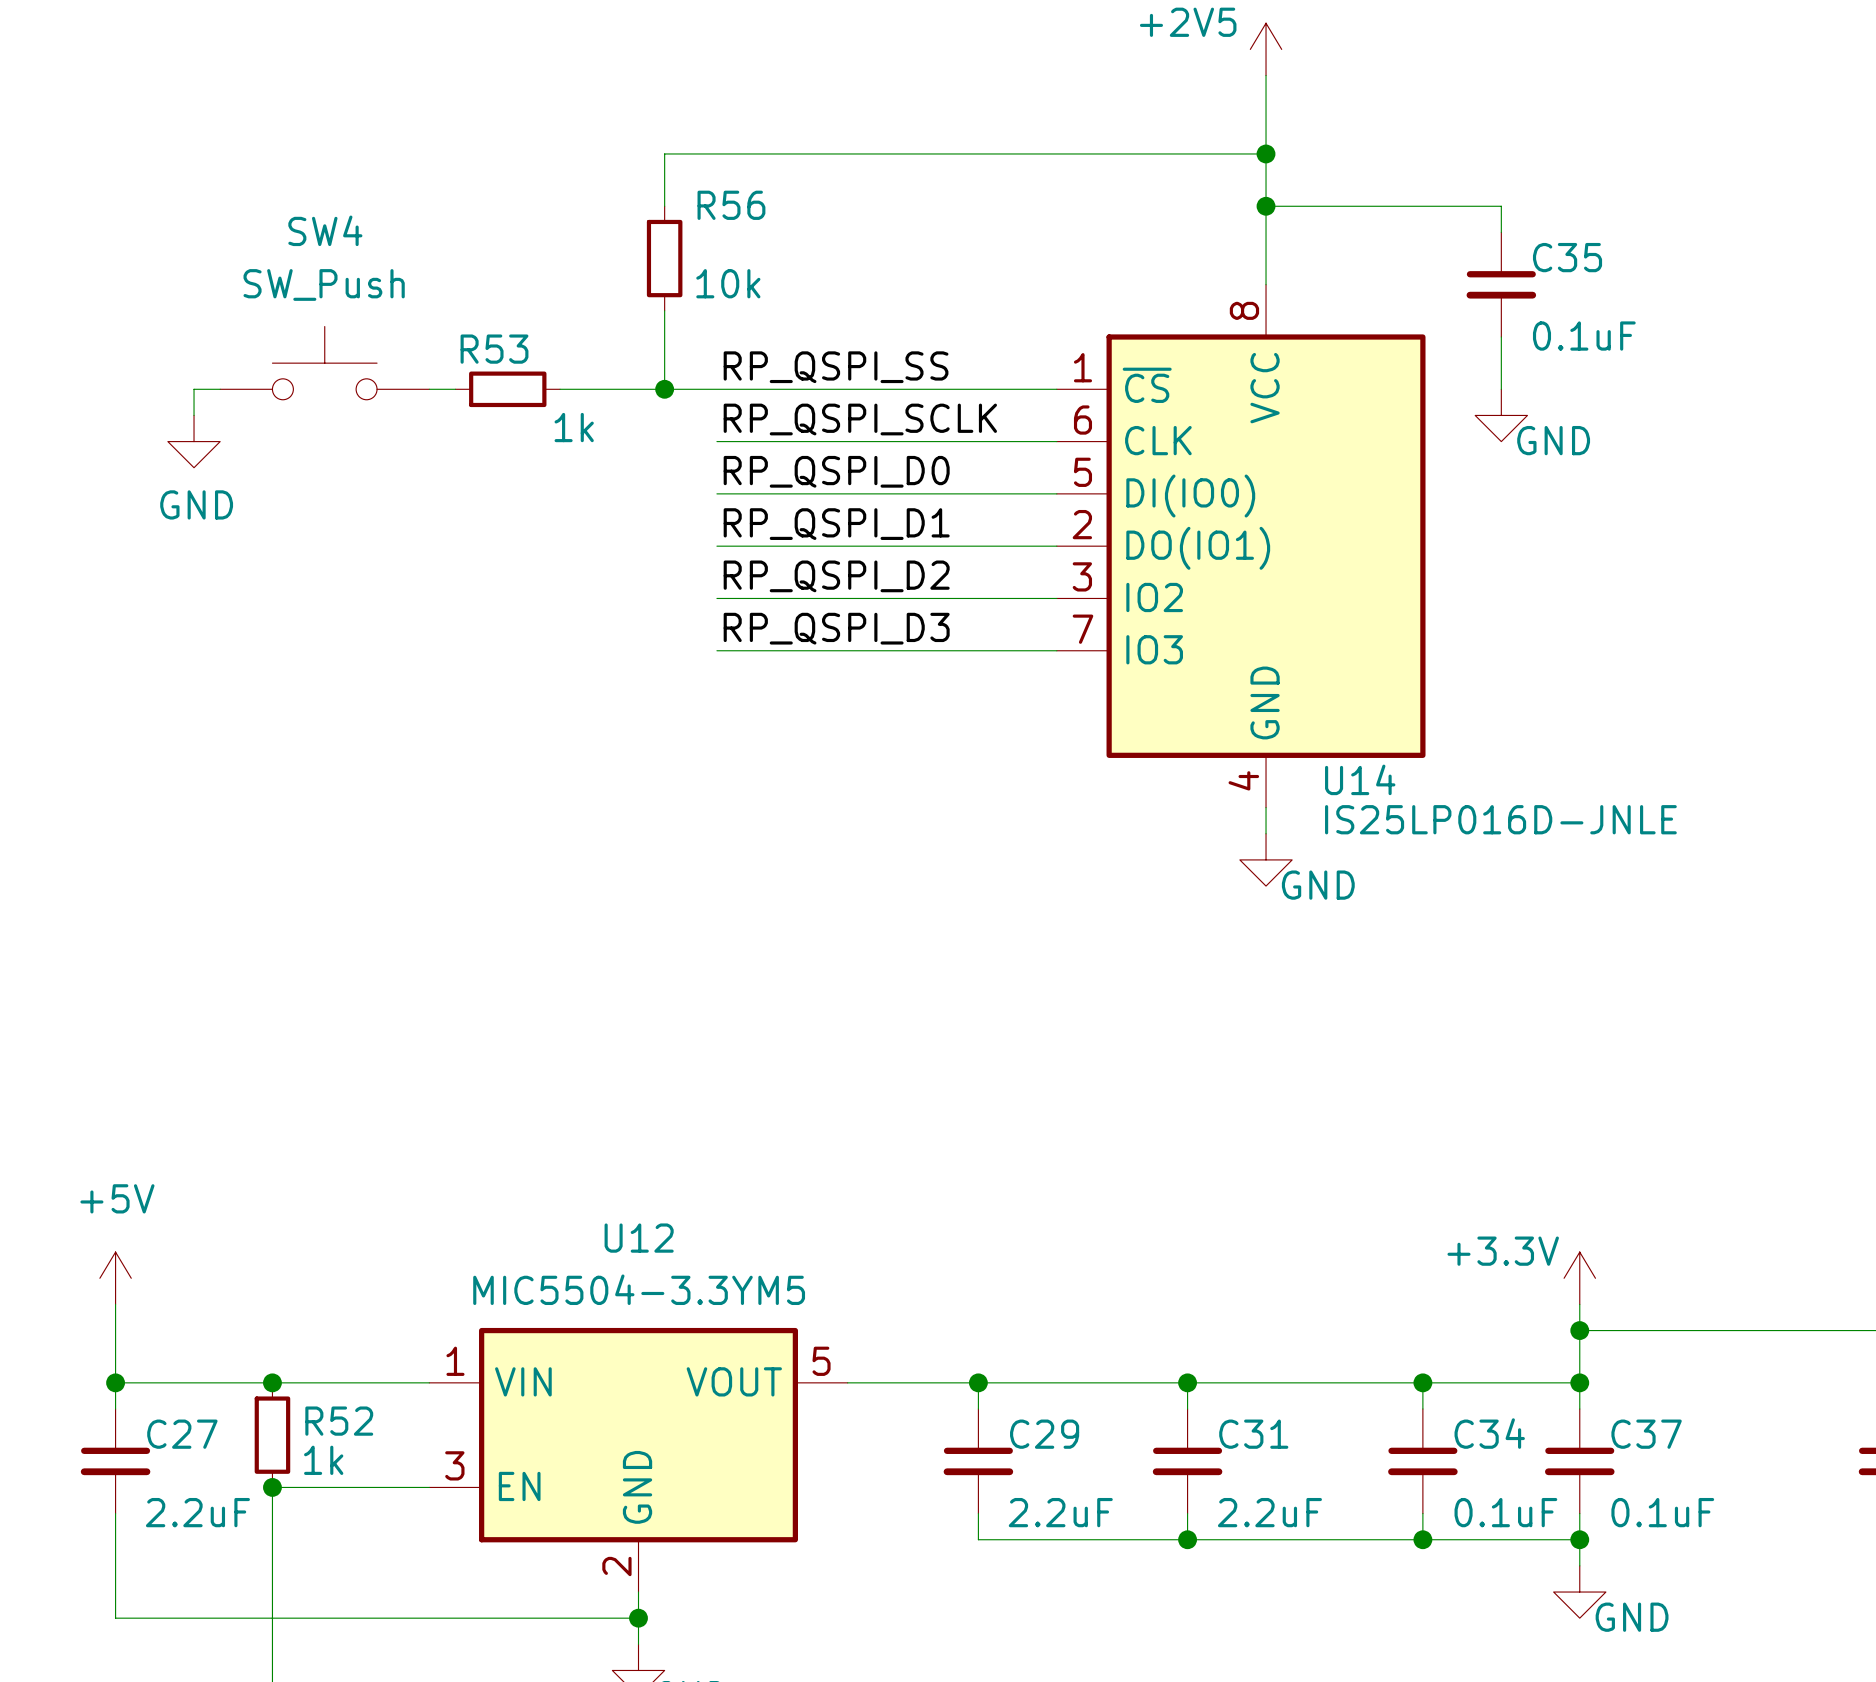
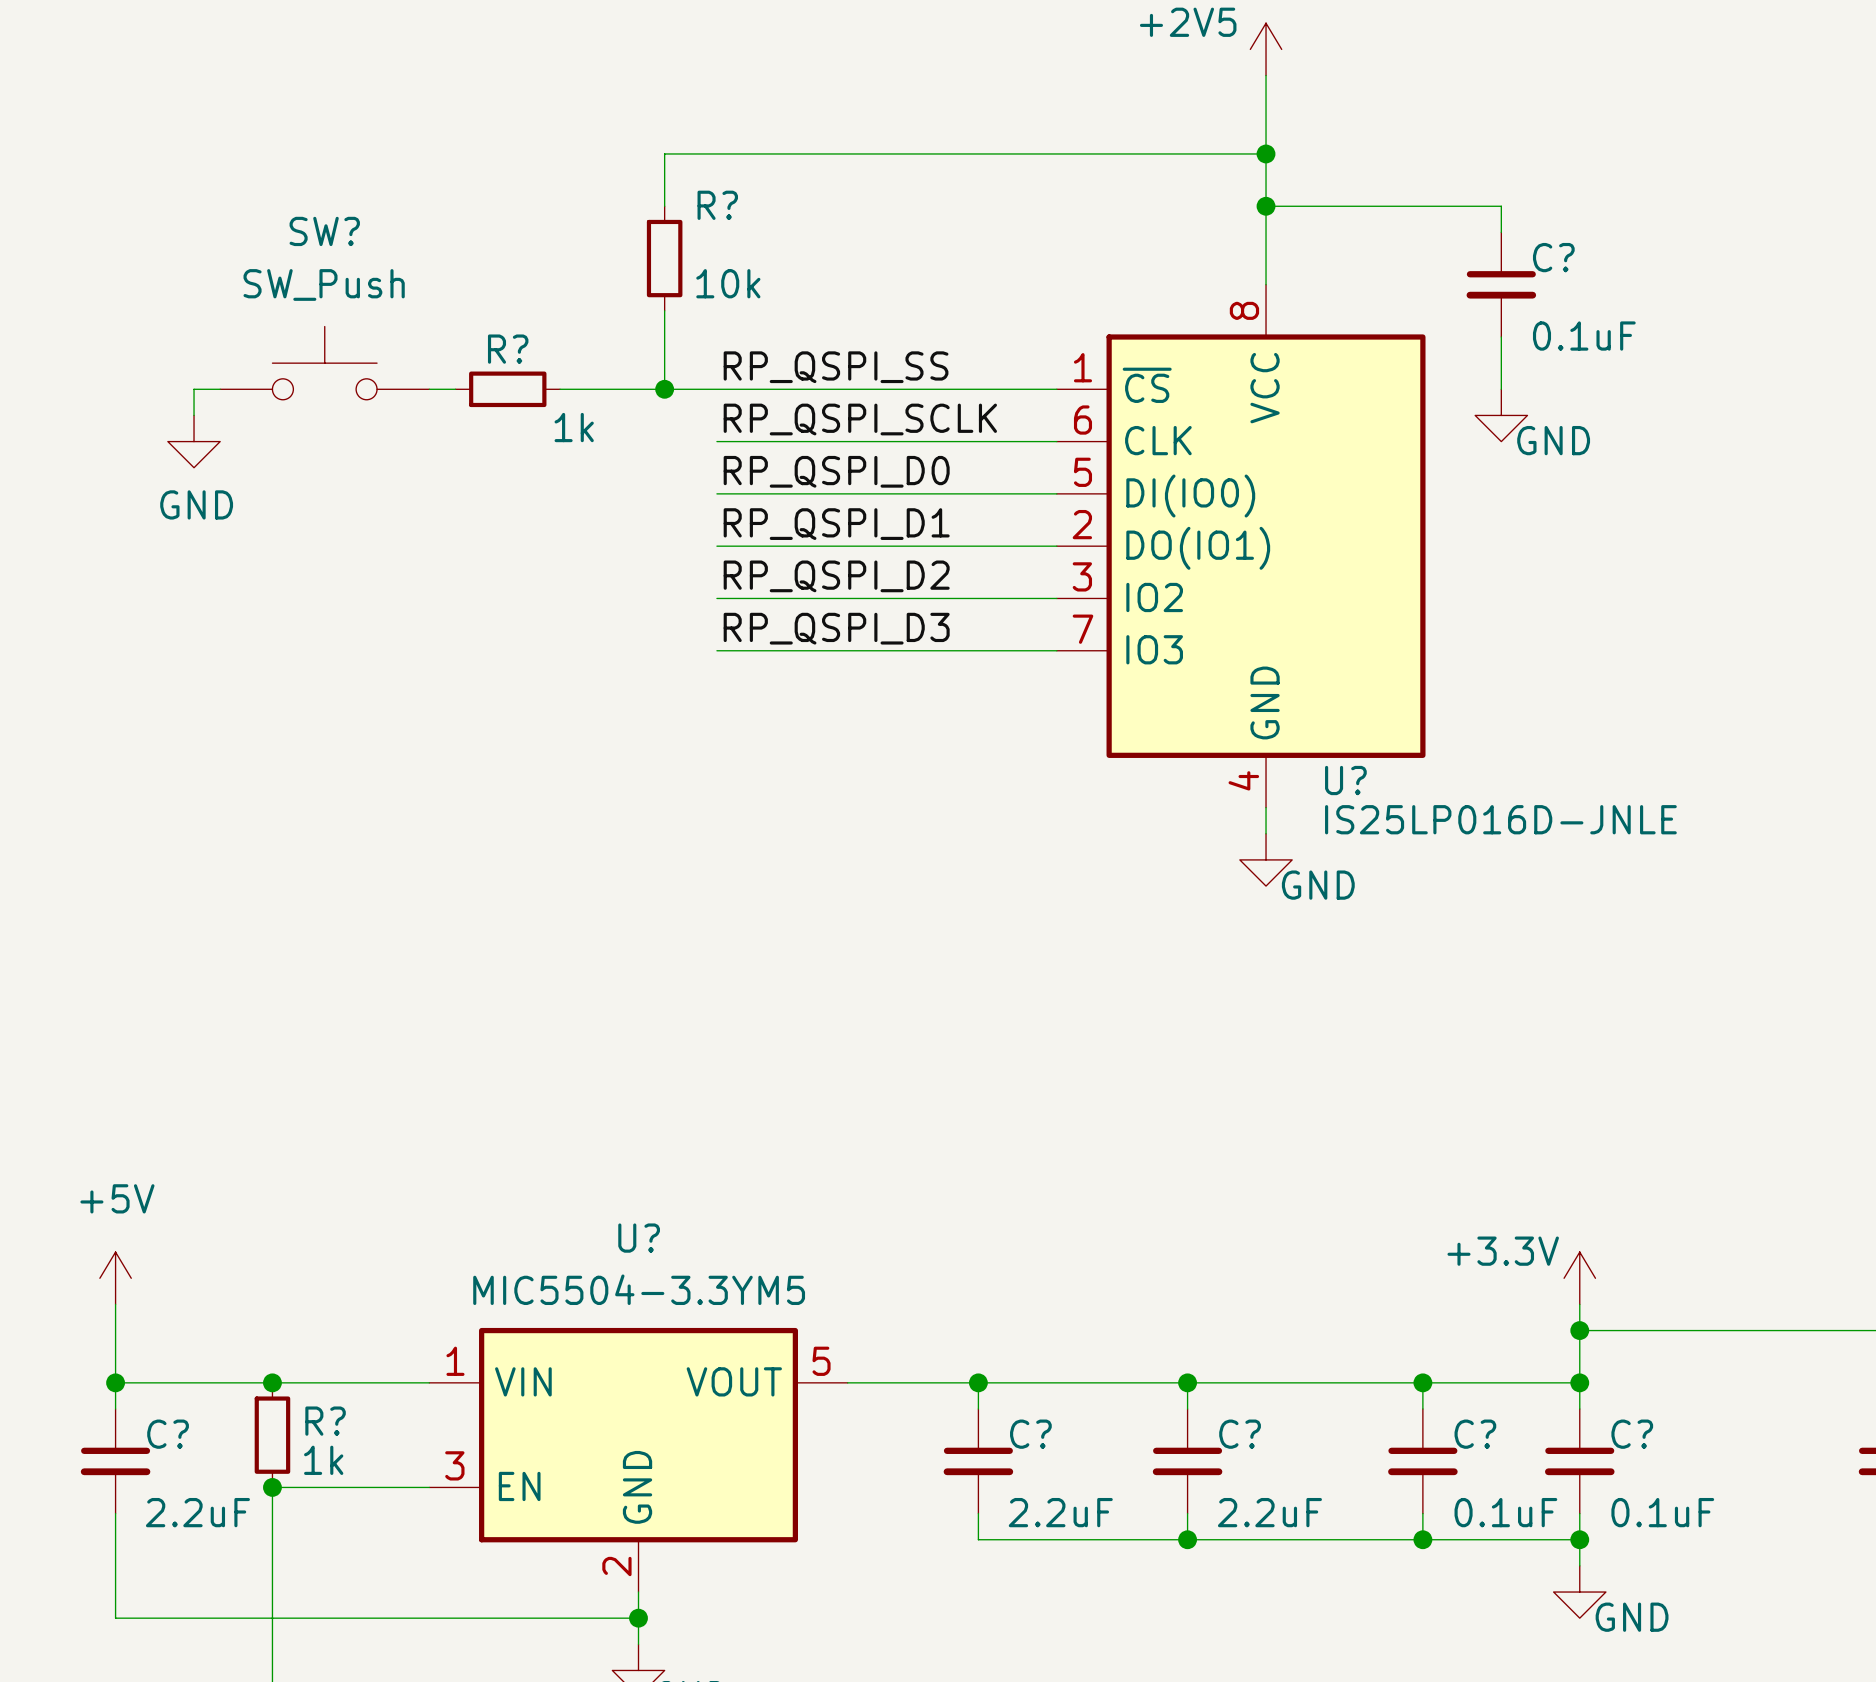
R56 name: R56 (731, 205) -> R? (717, 205)
SW4 name: SW4 (325, 230) -> SW? (324, 231)
C35 name: C35 (1567, 257) -> C? (1553, 257)
R53 name: R53 (494, 349) -> R? (508, 349)
U14 name: U14 (1360, 779) -> U? (1345, 780)
U12 name: U12 (639, 1238) -> U? (639, 1238)
R52 name: R52 (339, 1421) -> R? (325, 1421)
C34 name: C34 (1489, 1433) -> C? (1475, 1434)
C27 name: C27 (182, 1434) -> C? (168, 1434)
C29 name: C29 (1044, 1434) -> C? (1030, 1434)
C31 name: C31 (1253, 1434) -> C? (1240, 1434)
C37 name: C37 (1646, 1434) -> C? (1632, 1434)

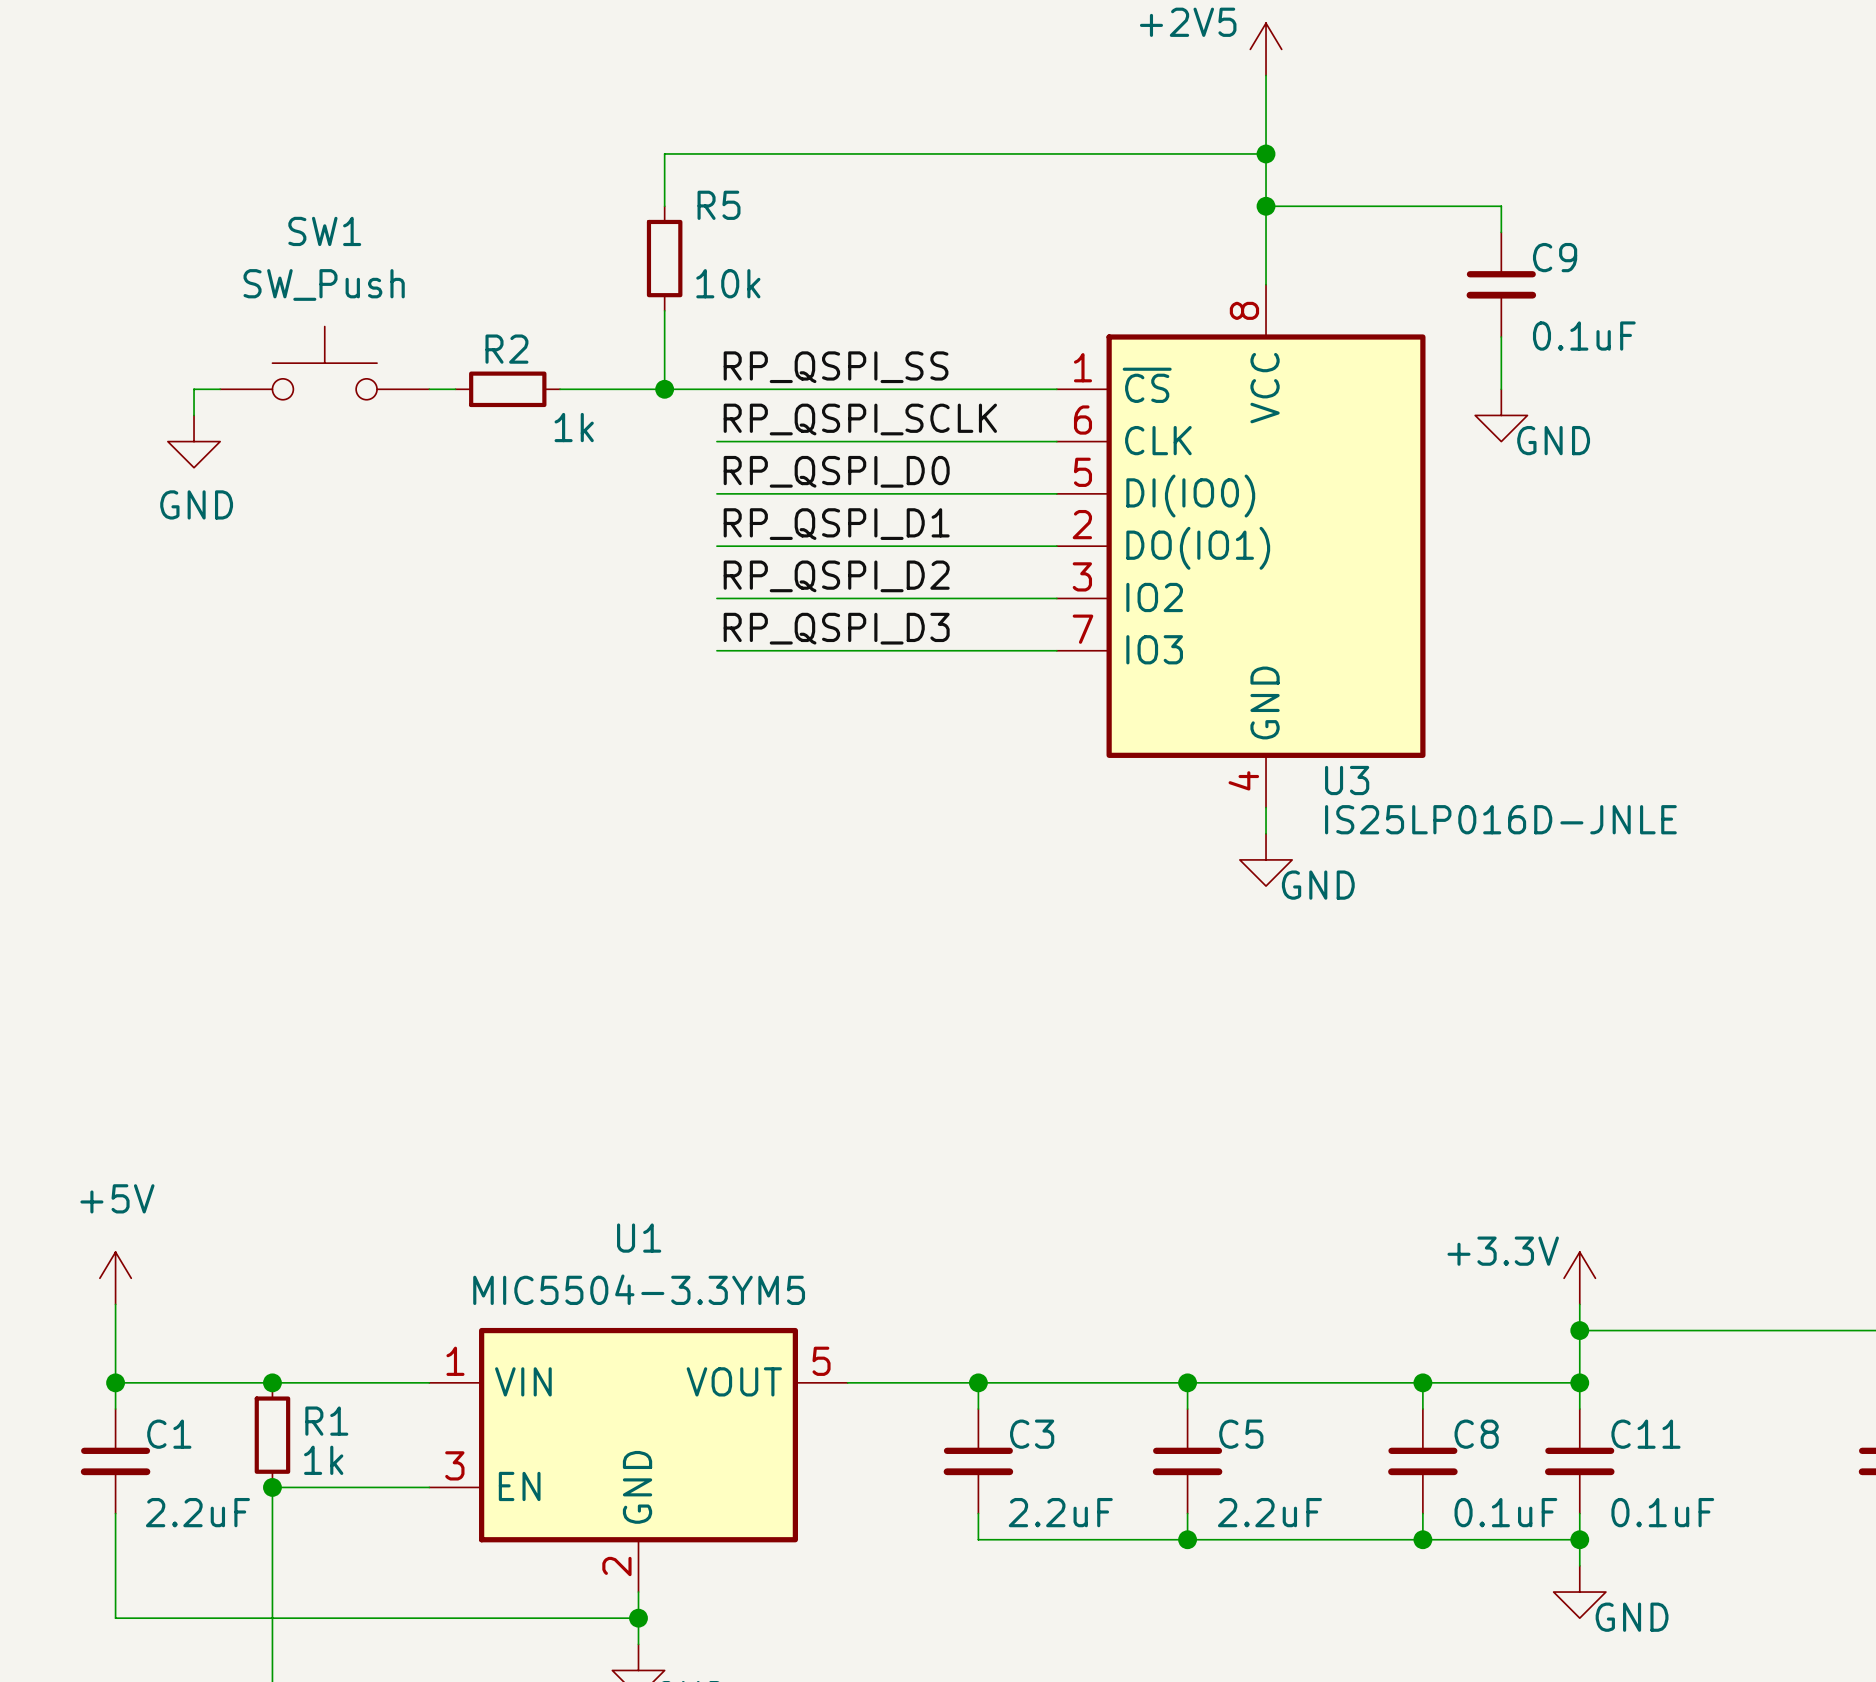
R? name: R? (717, 205) -> R5 (719, 205)
SW? name: SW? (324, 231) -> SW1 (324, 231)
C? name: C? (1553, 257) -> C9 (1555, 257)
R? name: R? (508, 349) -> R2 (506, 349)
U? name: U? (1345, 780) -> U3 (1347, 780)
U? name: U? (639, 1238) -> U1 (639, 1238)
R? name: R? (325, 1421) -> R1 (326, 1421)
C? name: C? (168, 1434) -> C1 (169, 1434)
C? name: C? (1030, 1434) -> C3 (1032, 1434)
C? name: C? (1240, 1434) -> C5 (1241, 1434)
C? name: C? (1475, 1434) -> C8 (1476, 1434)
C? name: C? (1632, 1434) -> C11 (1645, 1434)

